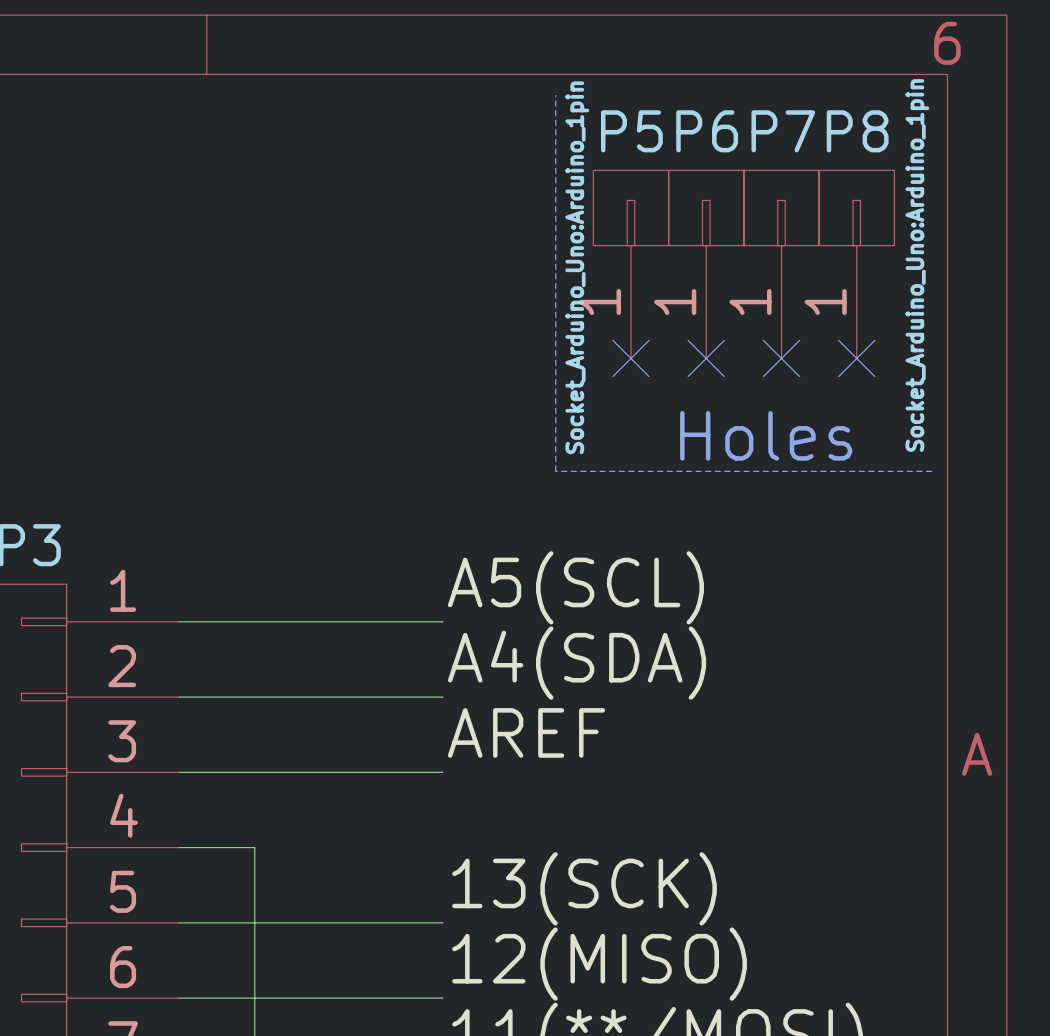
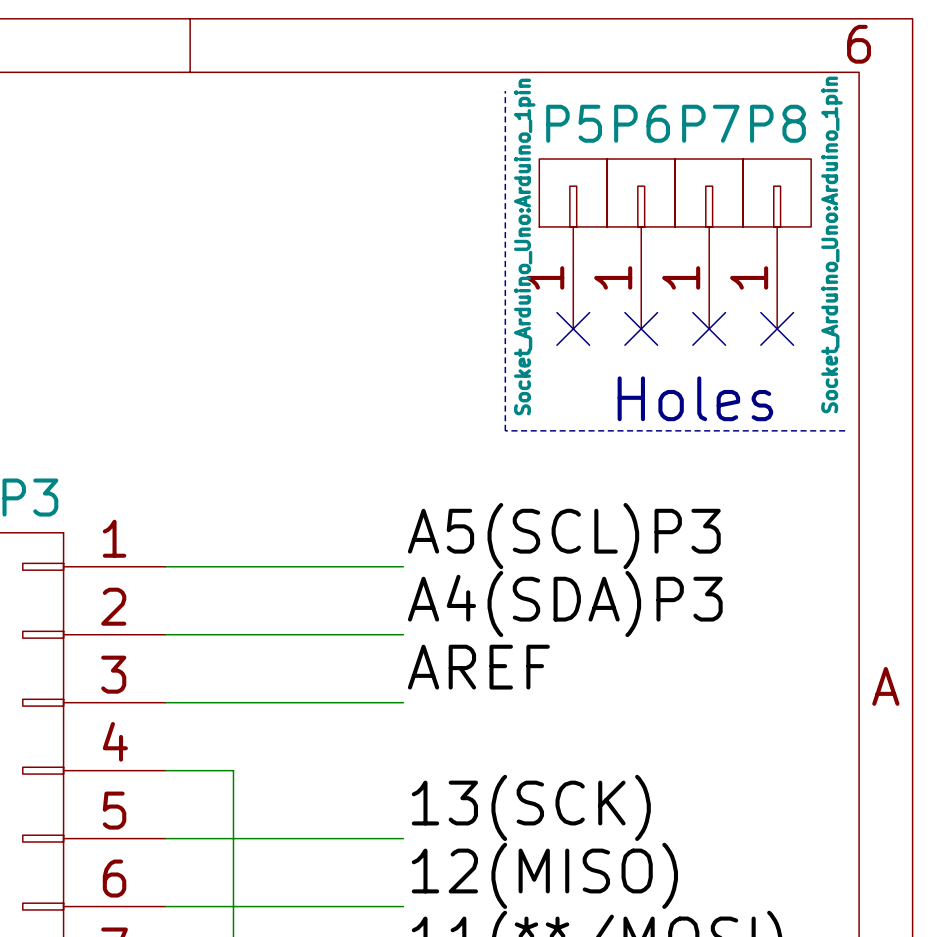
label: A5(SCL) (575, 587) -> A5(SCL)P3 (564, 536)
label: A4(SDA) (577, 663) -> A4(SDA)P3 (565, 604)

